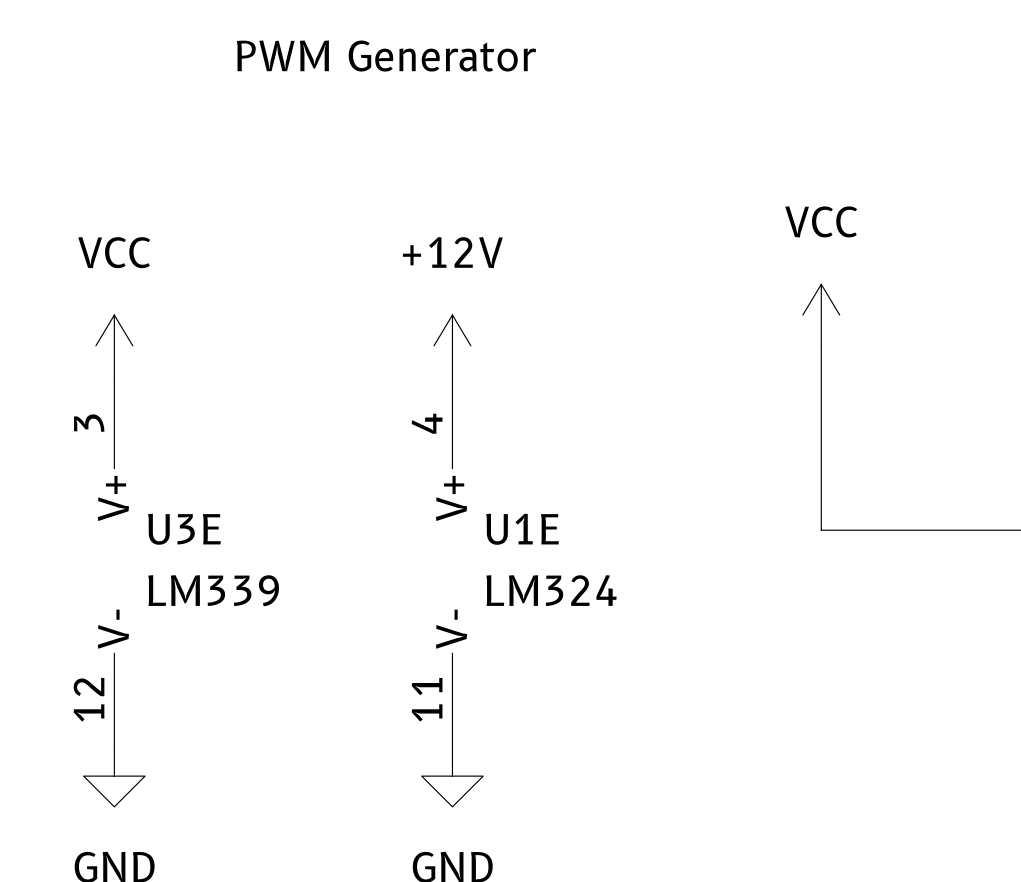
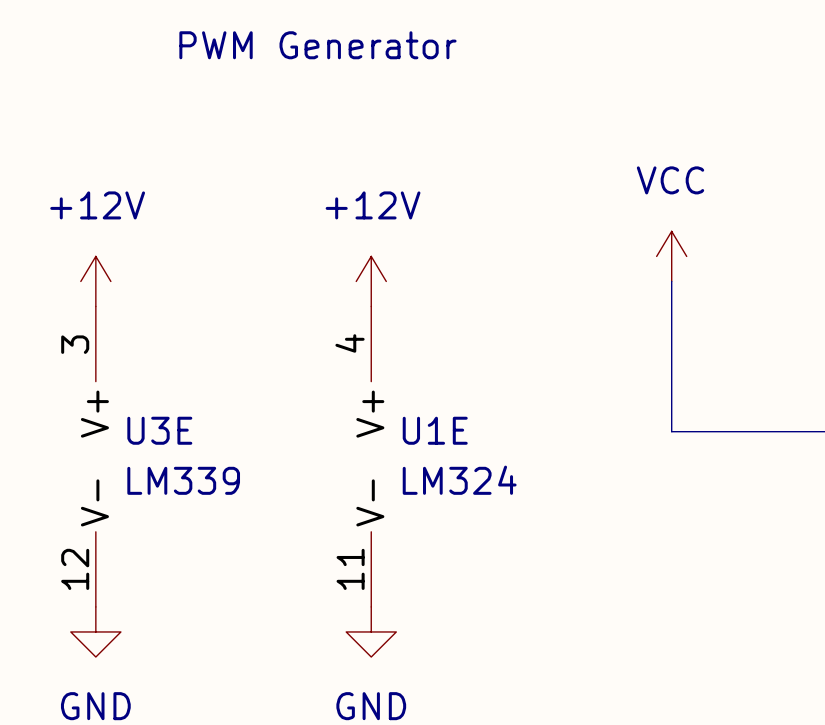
power symbol: VCC (114, 345) -> +12V (95, 281)

